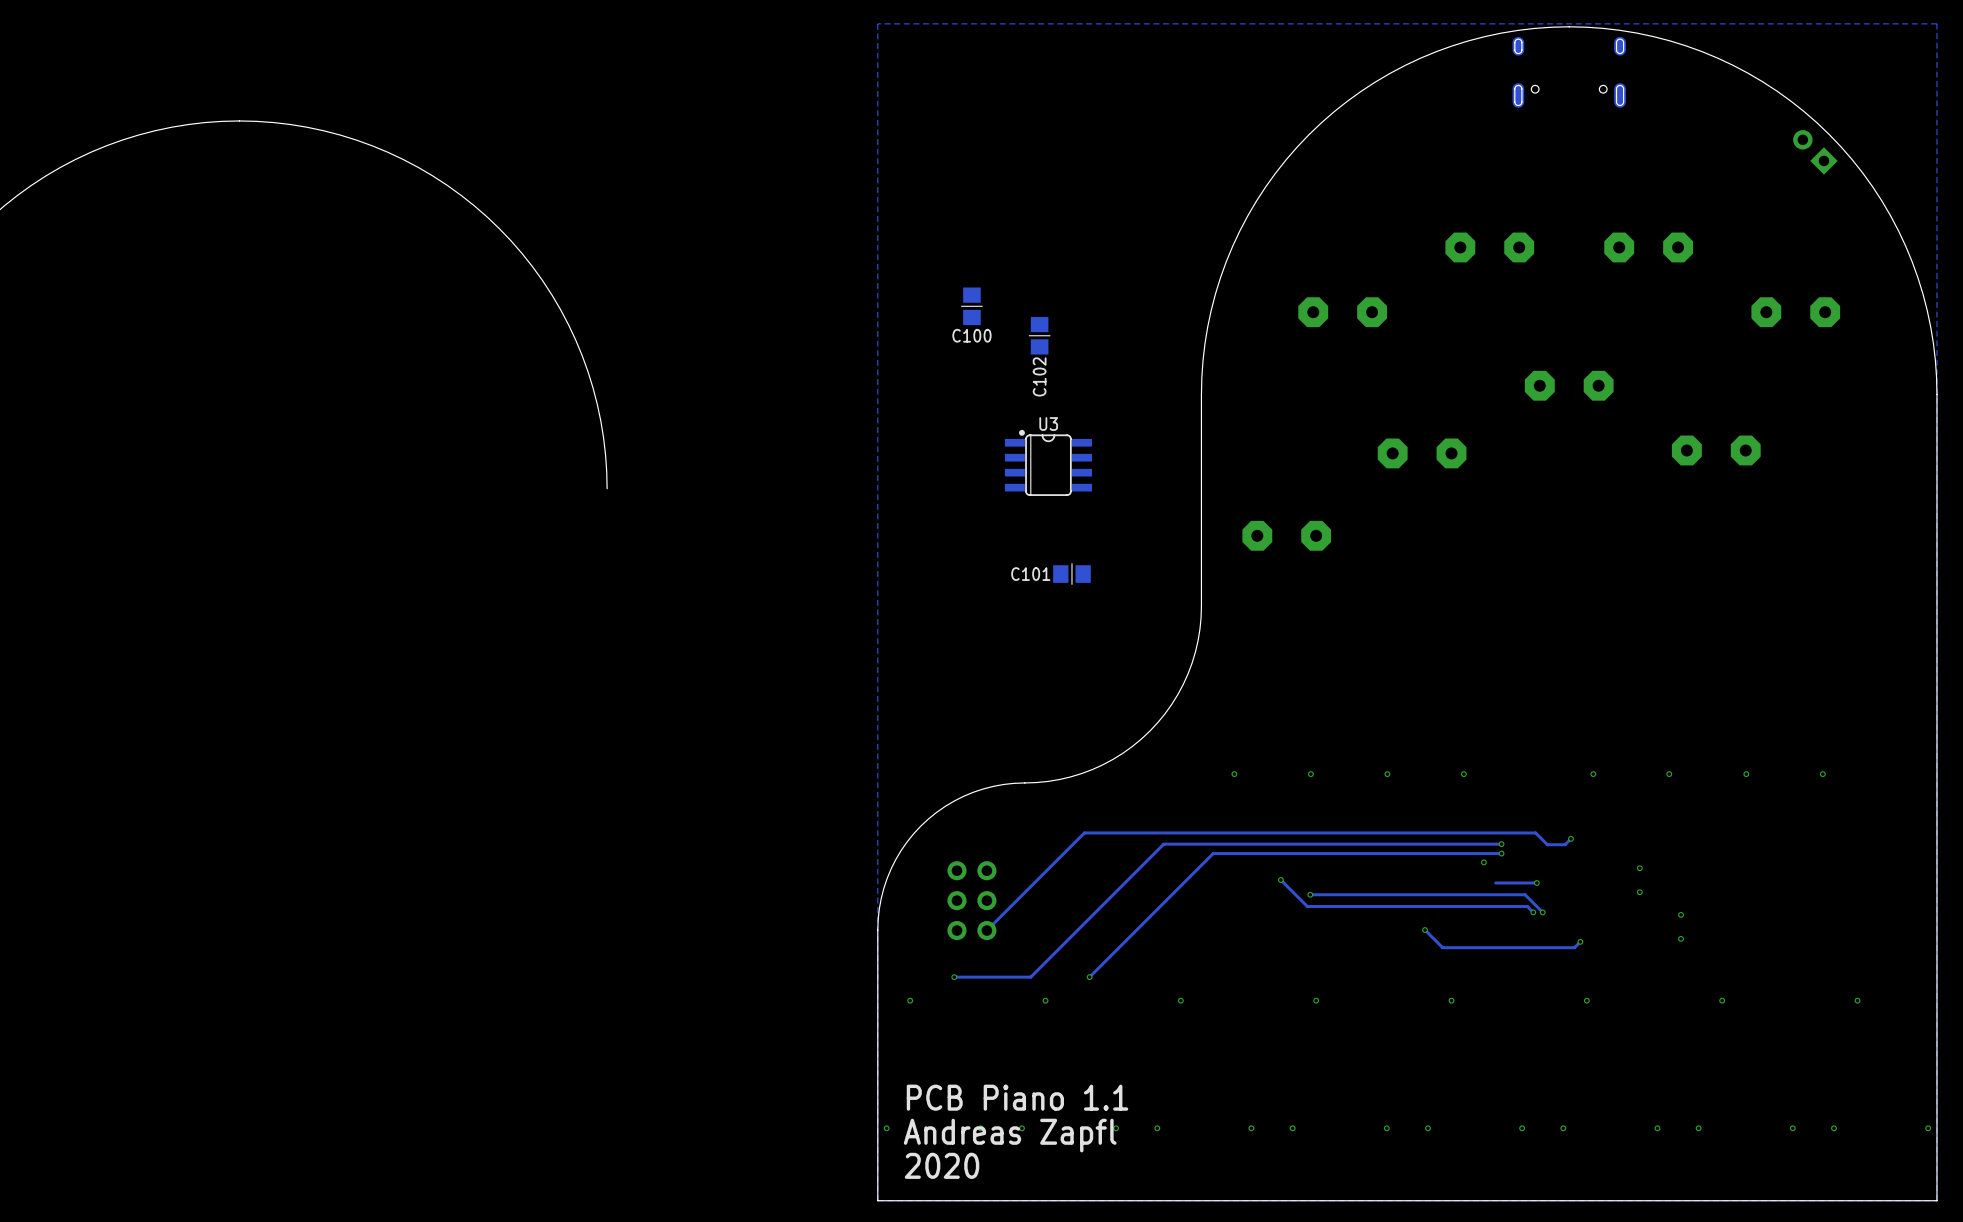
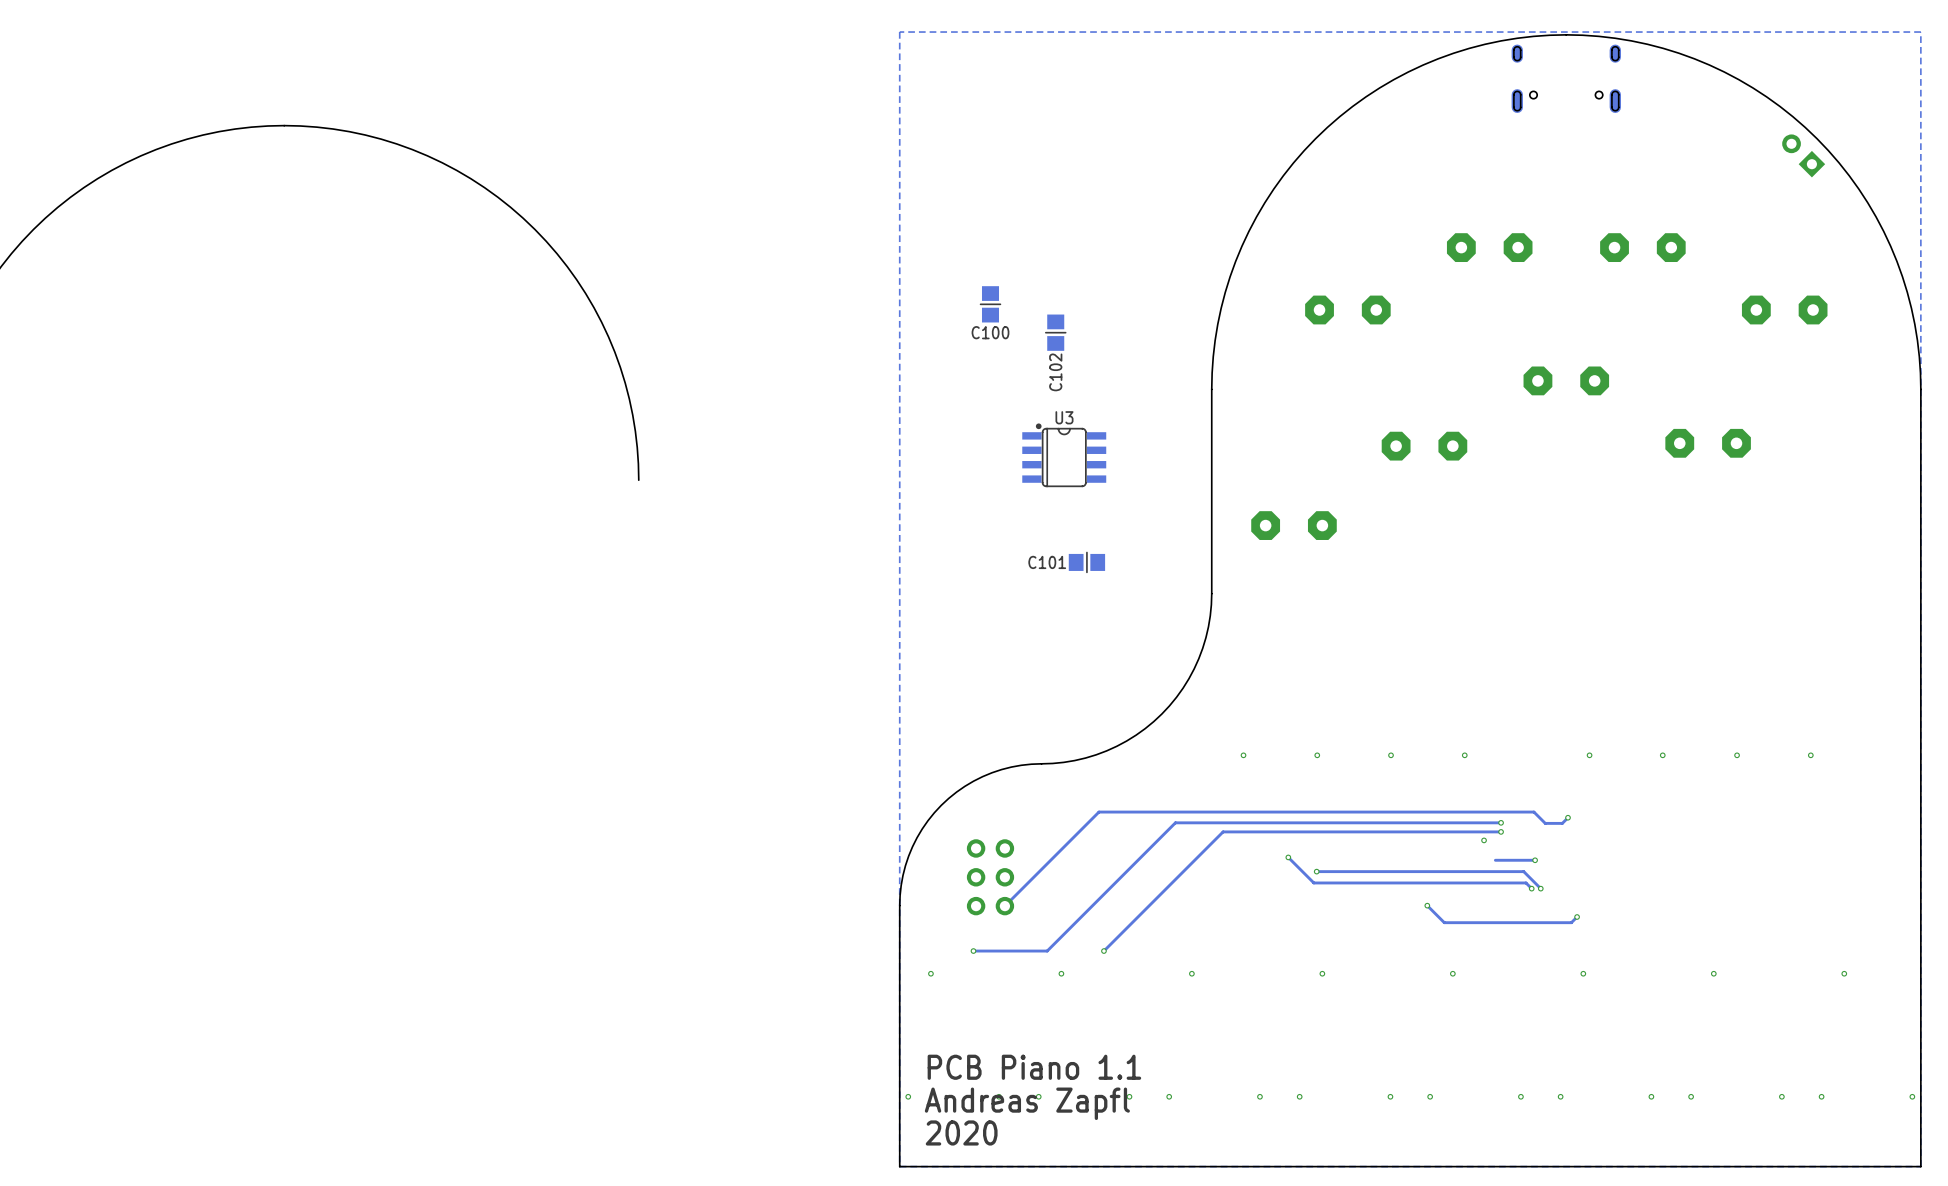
via: (1639, 868) -> none
via: (1639, 892) -> none
via: (1681, 914) -> none
via: (1681, 938) -> none

